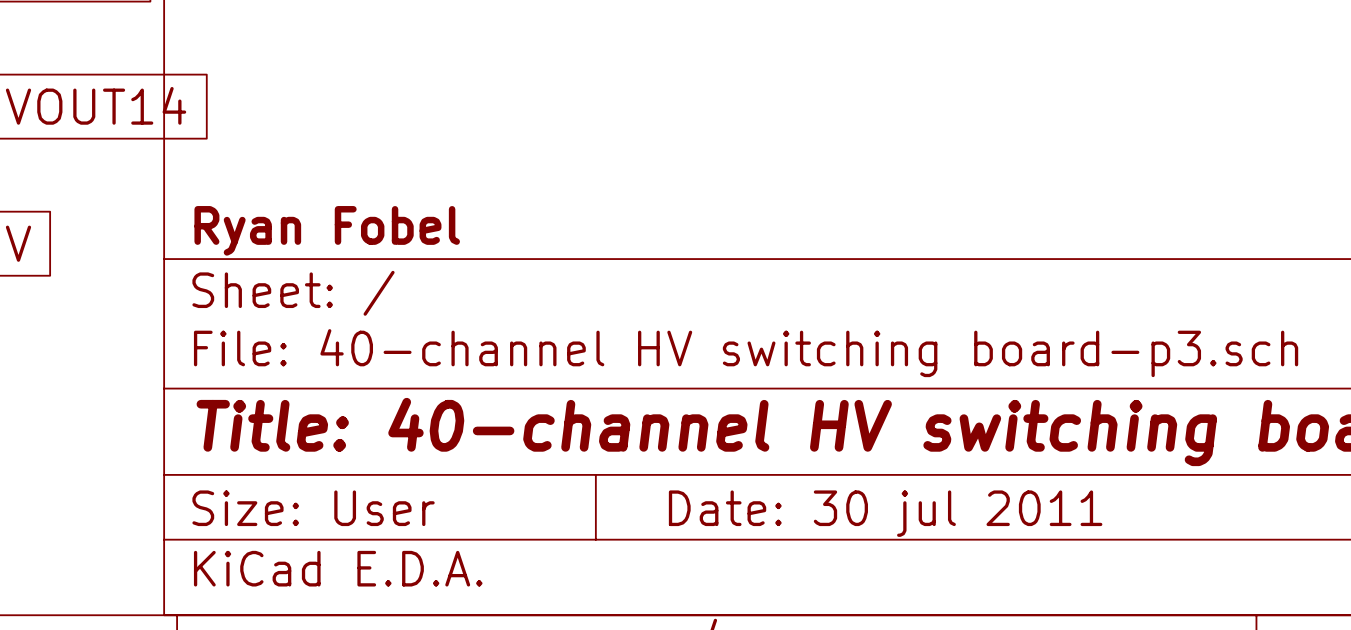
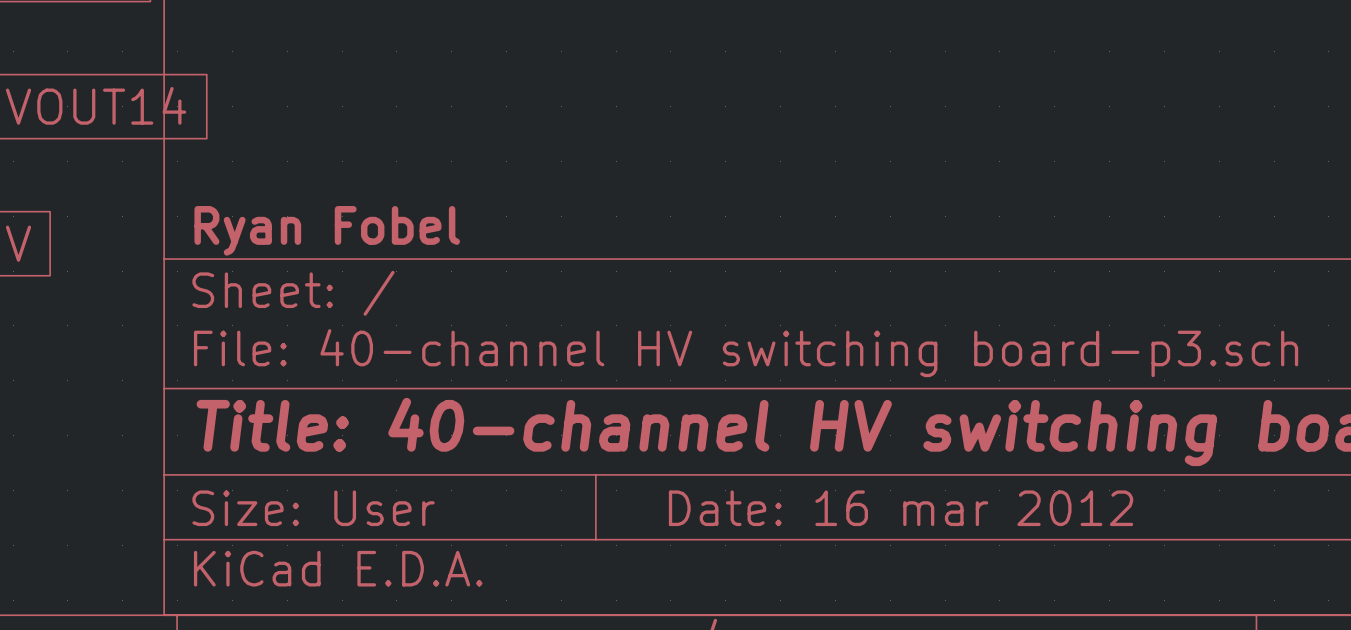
title block: Date: 30 jul 2011 (885, 513) -> Date: 16 mar 2012 (901, 508)

